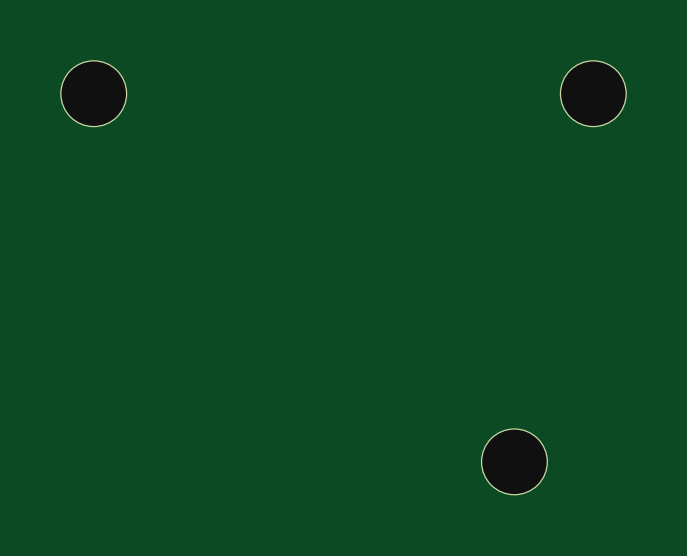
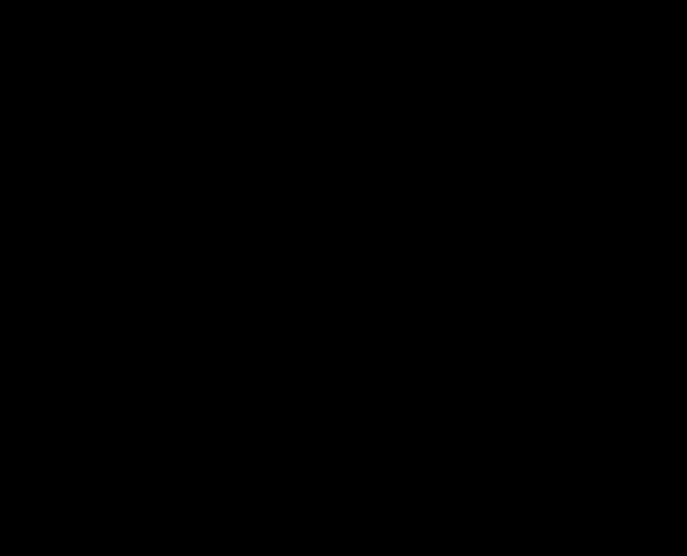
part: (93, 93) -> none
part: (593, 93) -> none
part: (514, 461) -> none

